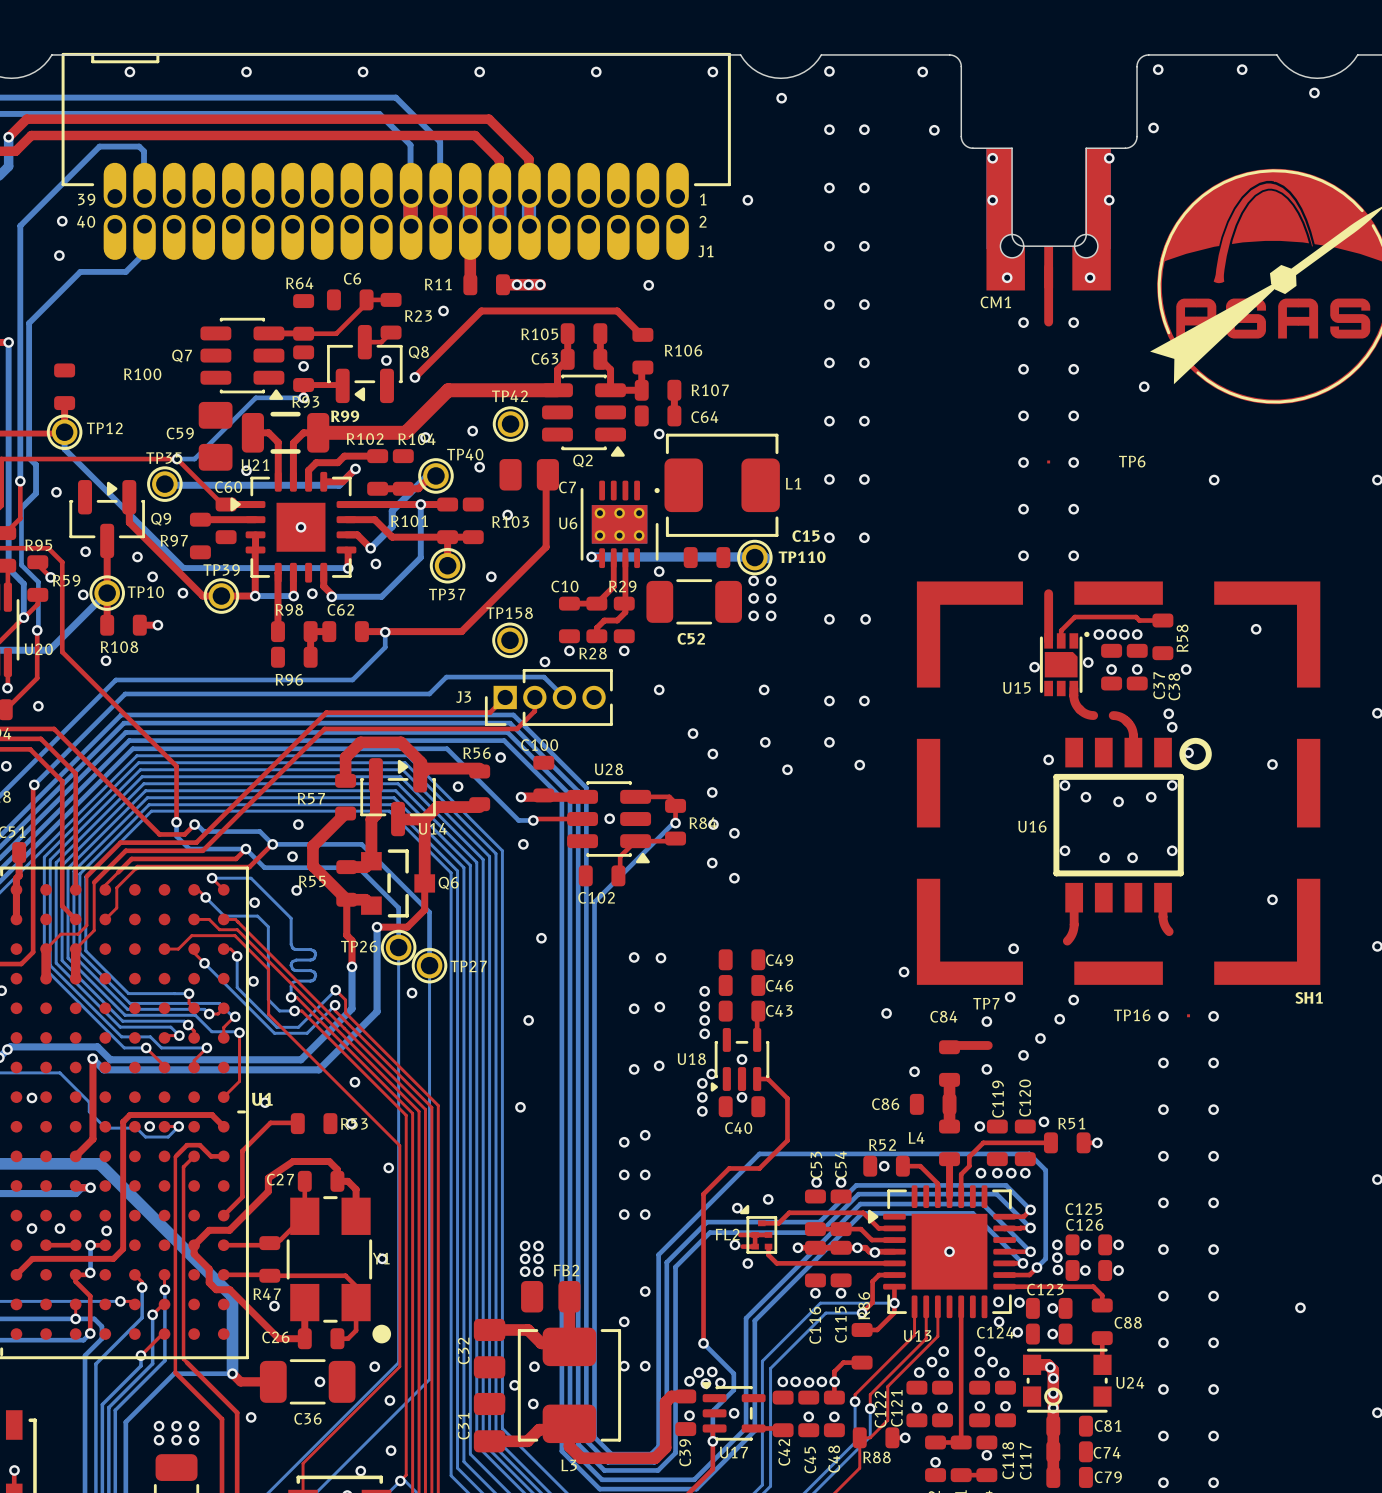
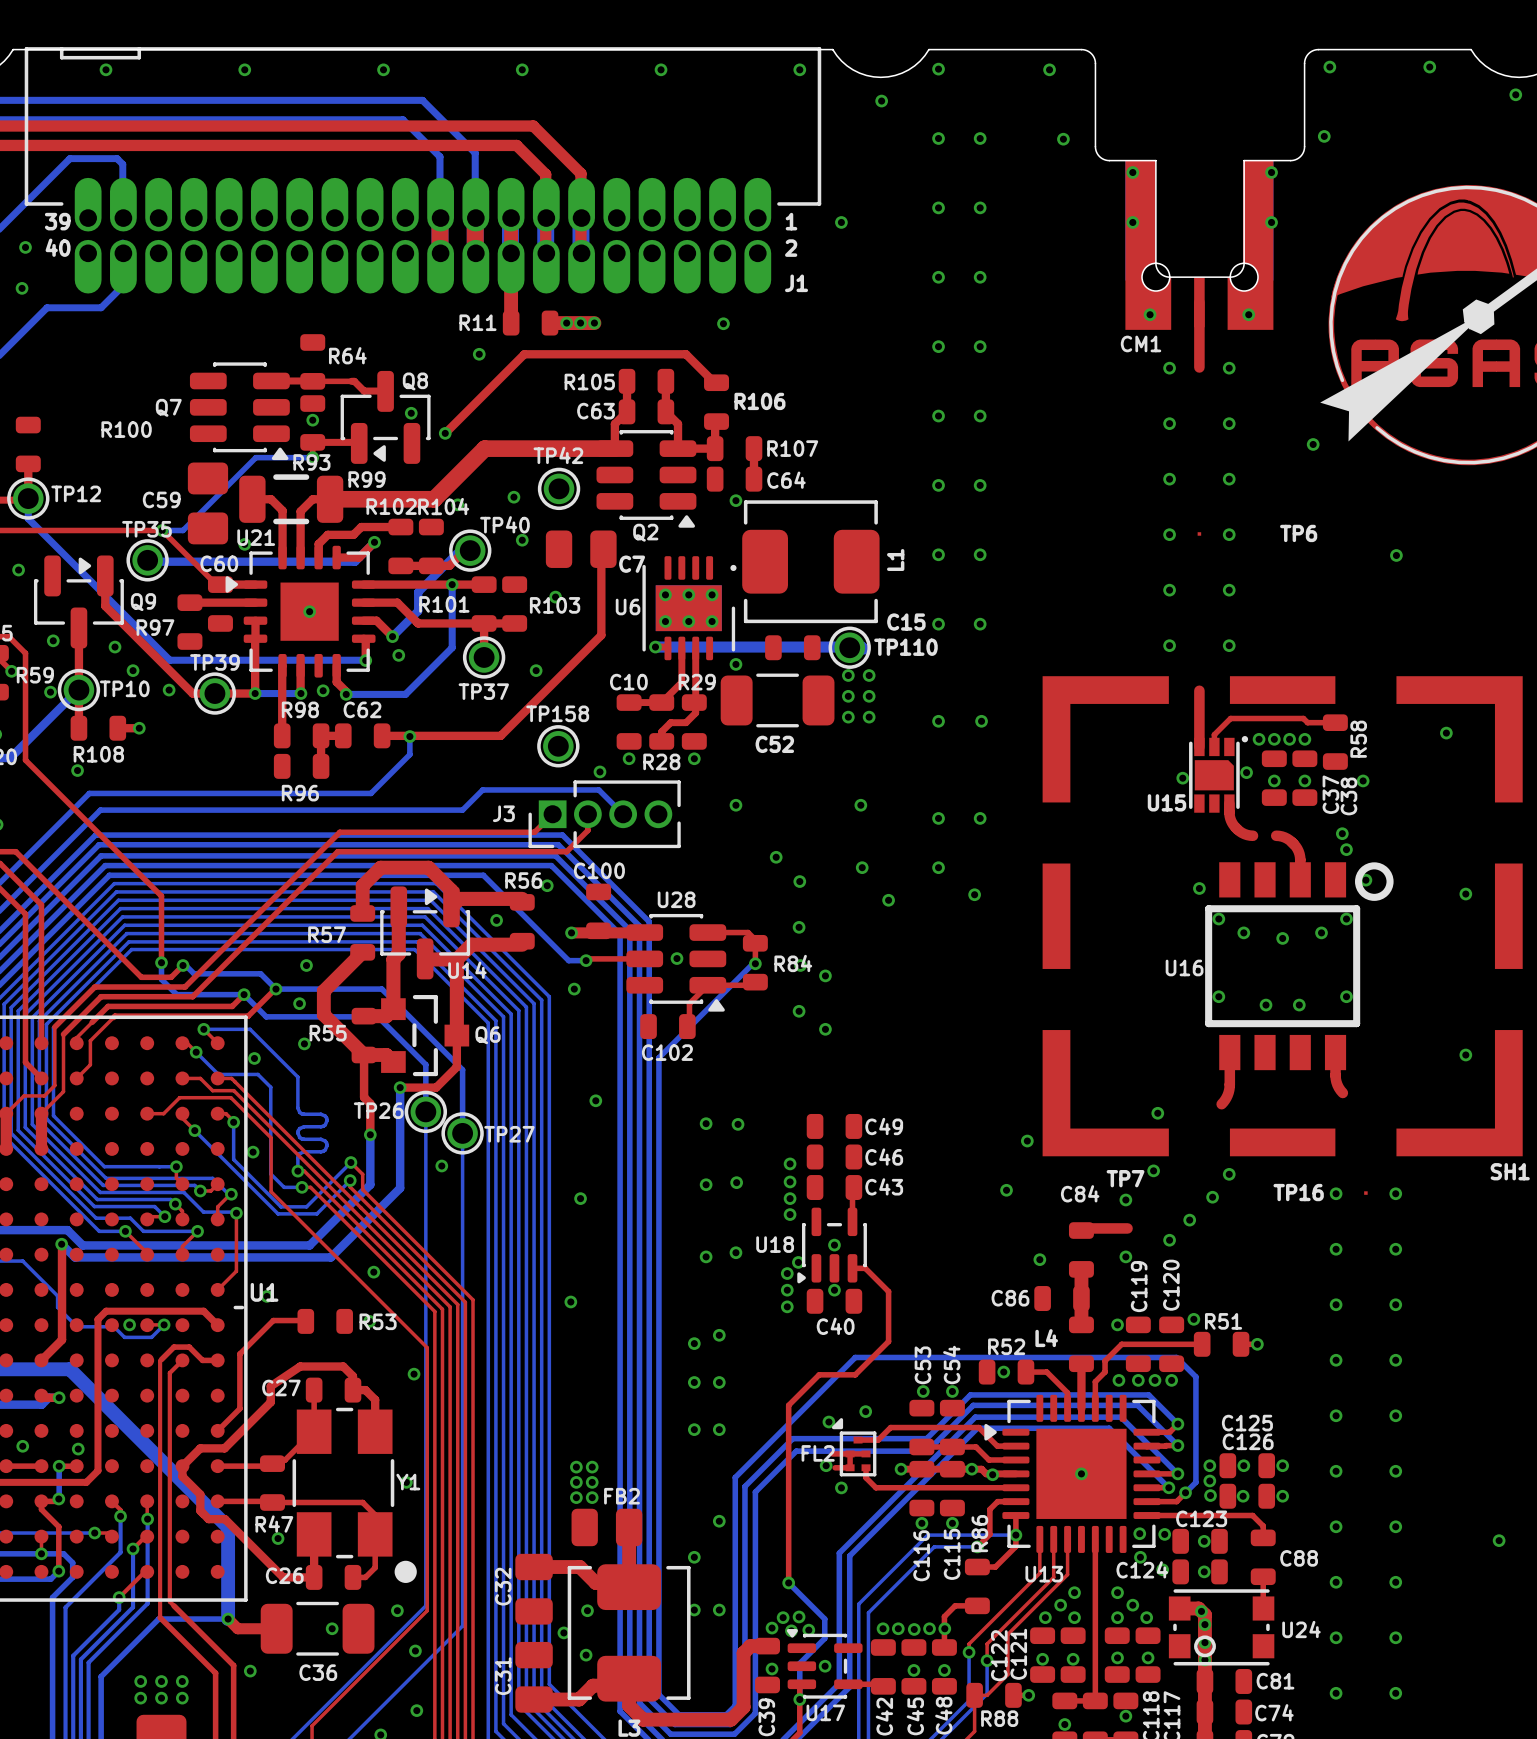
R64 name position: R64 (299, 283) -> R64 (347, 355)
C6: (350, 299) -> none
top track: (391, 299) (366, 299) (366, 303) (336, 333) -> (385, 391) (364, 391) (354, 381) (351, 381)
R23: (391, 316) -> none
top track: (391, 332) (381, 342) (364, 342) -> none
Q8 name position: Q8 (418, 352) -> Q8 (415, 381)
L1 name rotation: 0° (793, 483) -> 90° counterclockwise (895, 560)

